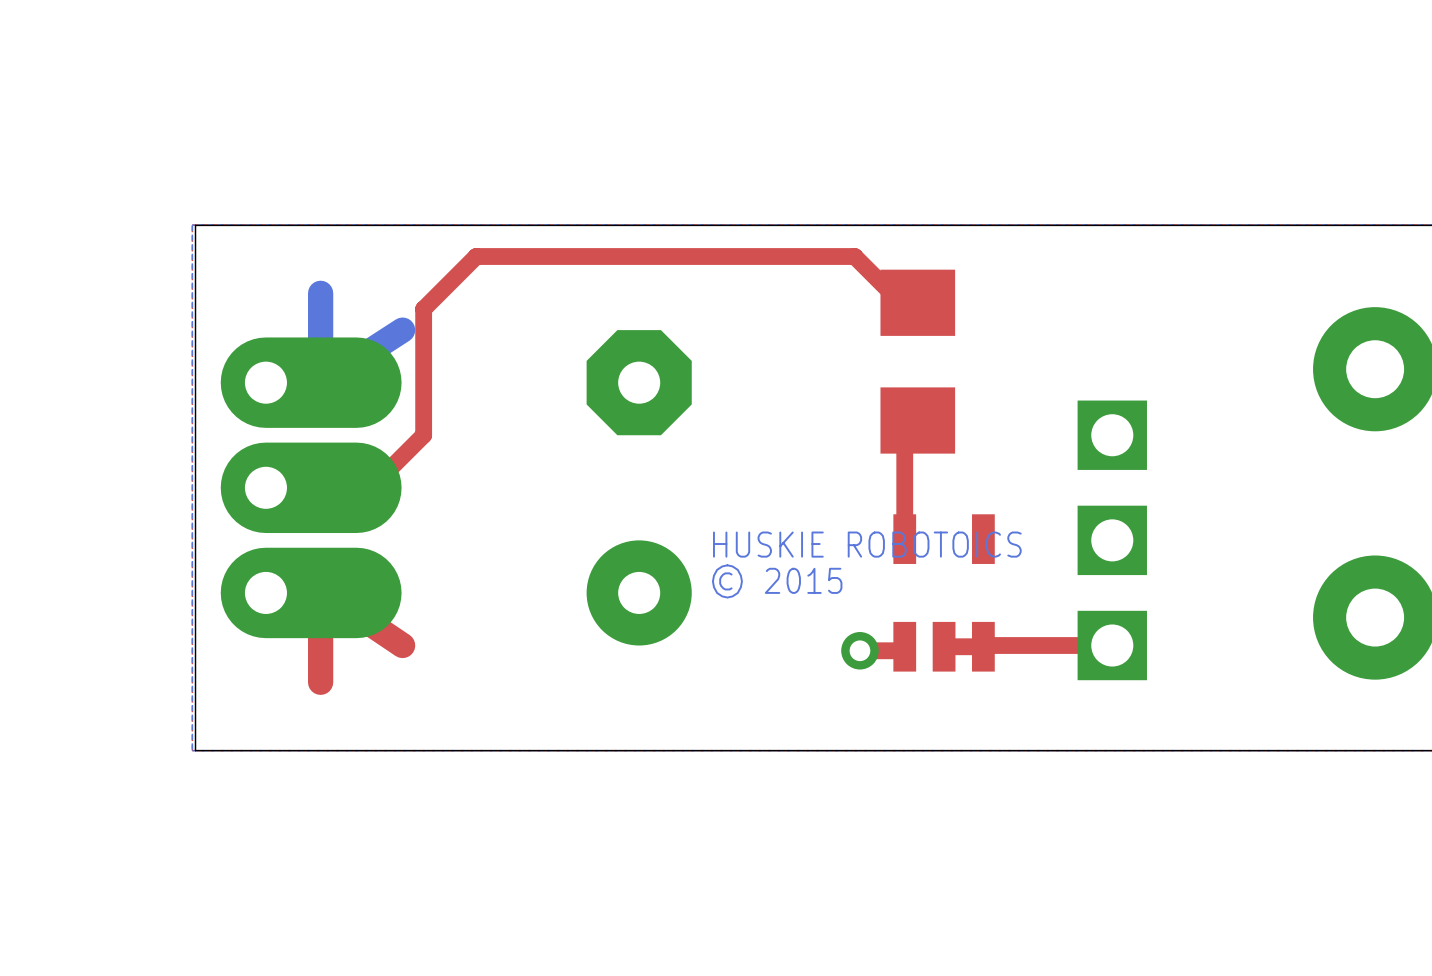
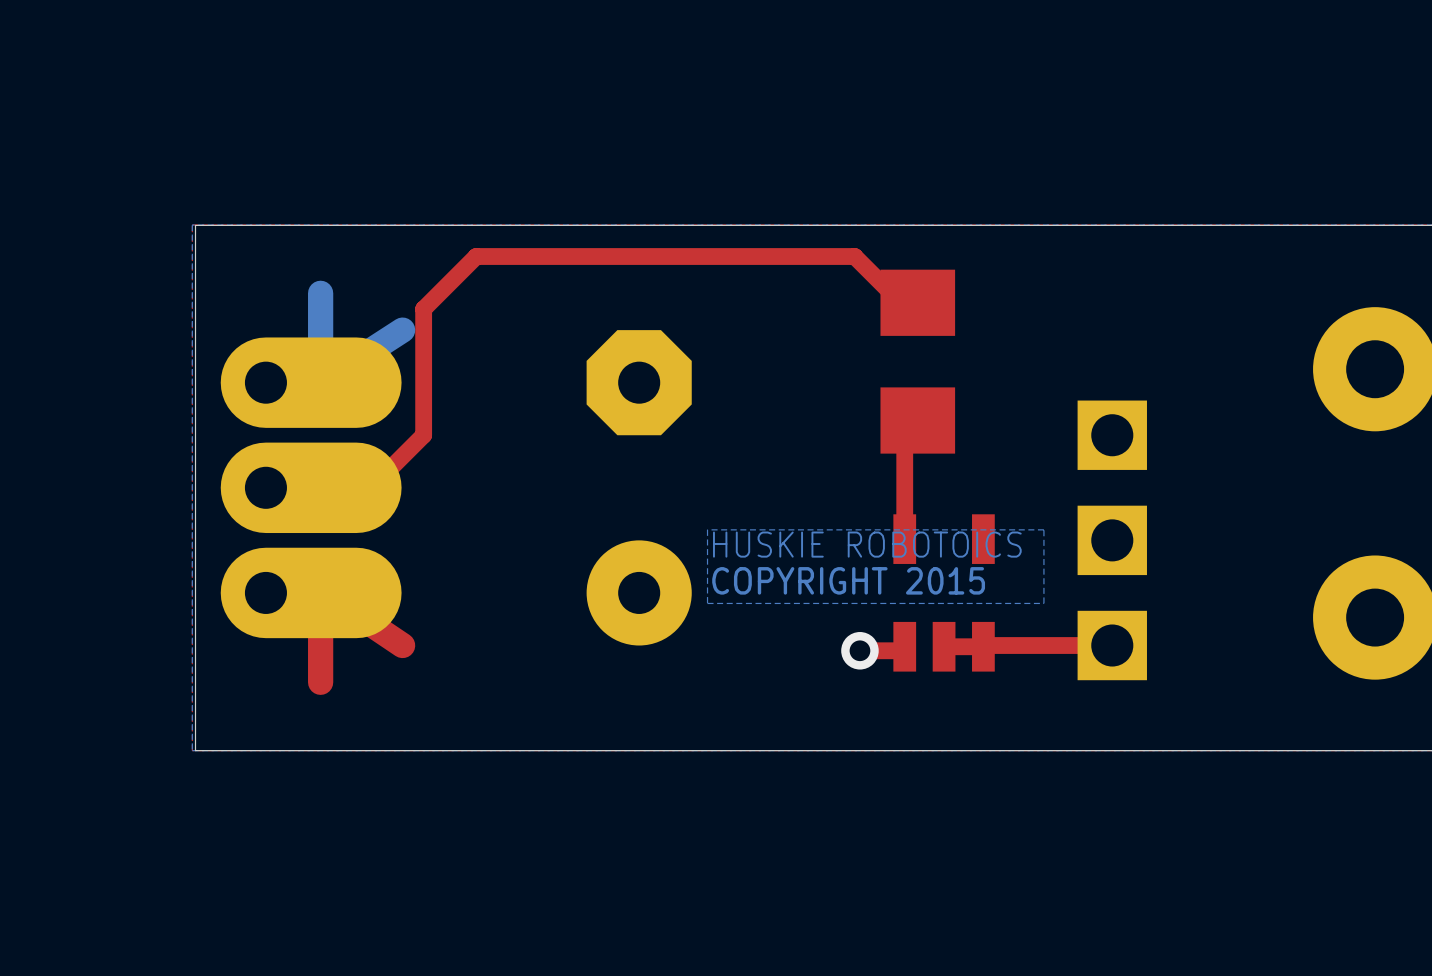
bottom zone outline: none -> (1043, 529) (1043, 603) (707, 603) (707, 529) (1043, 529)
text: © 2015 (777, 581) -> COPYRIGHT 2015 (848, 580)

